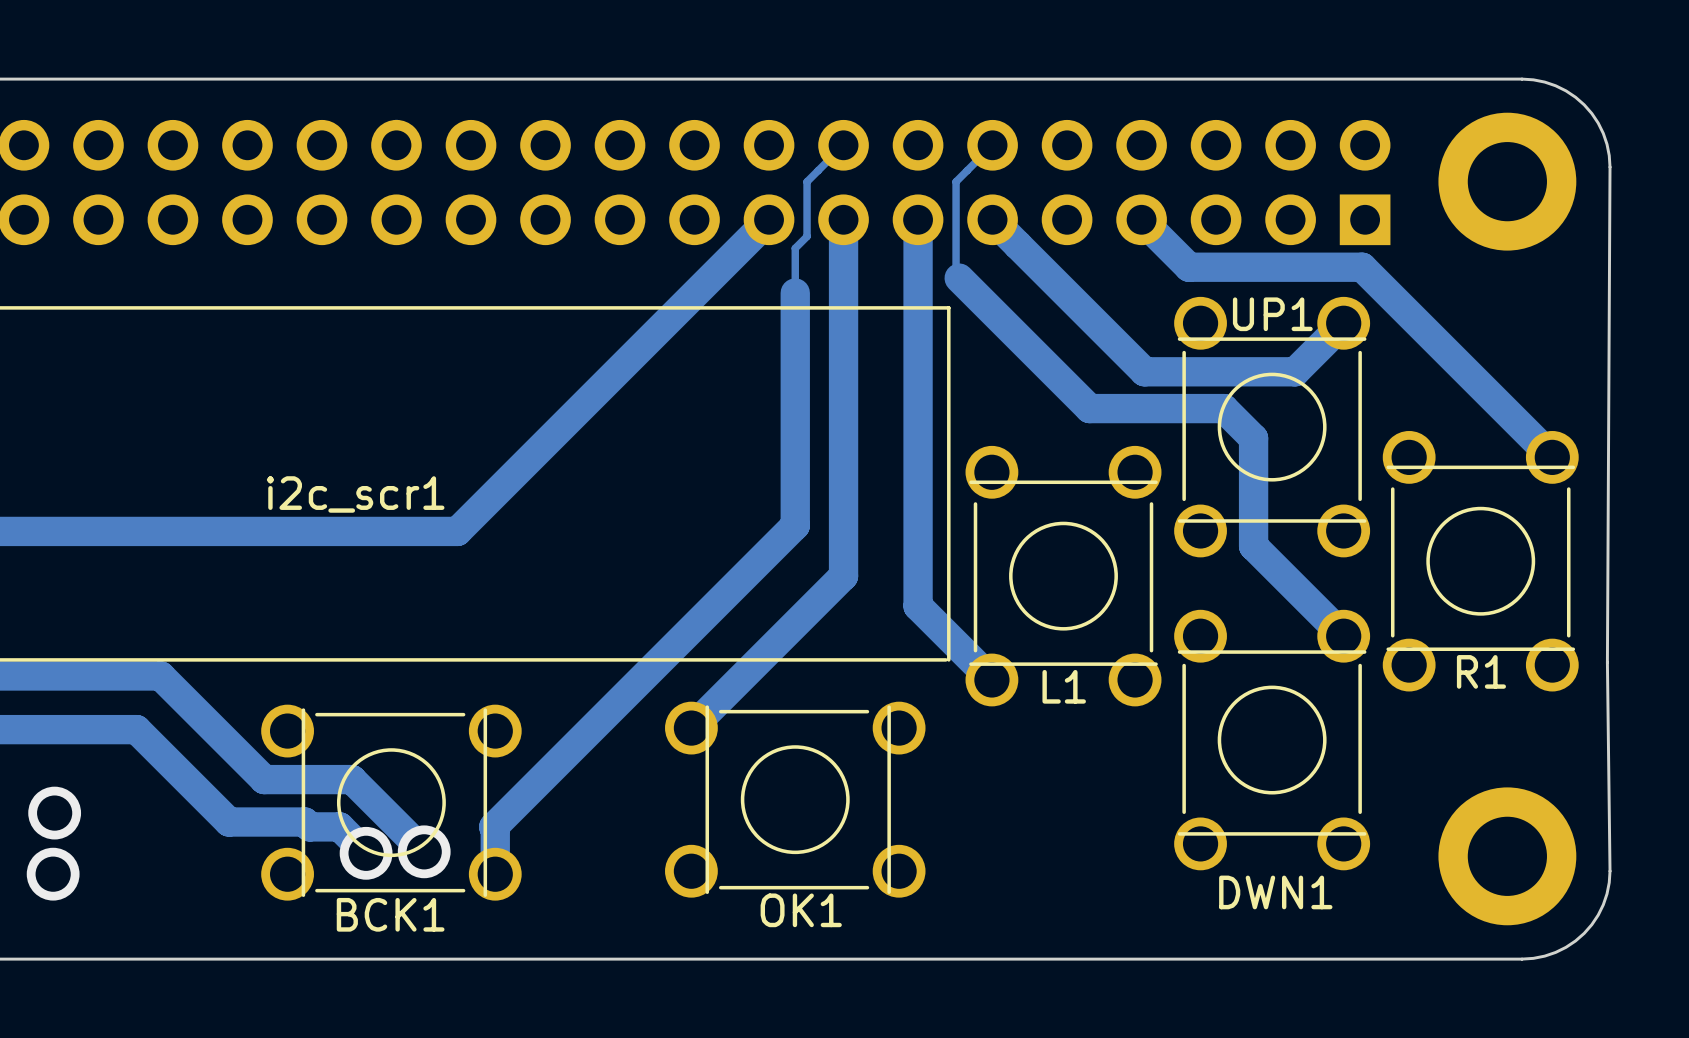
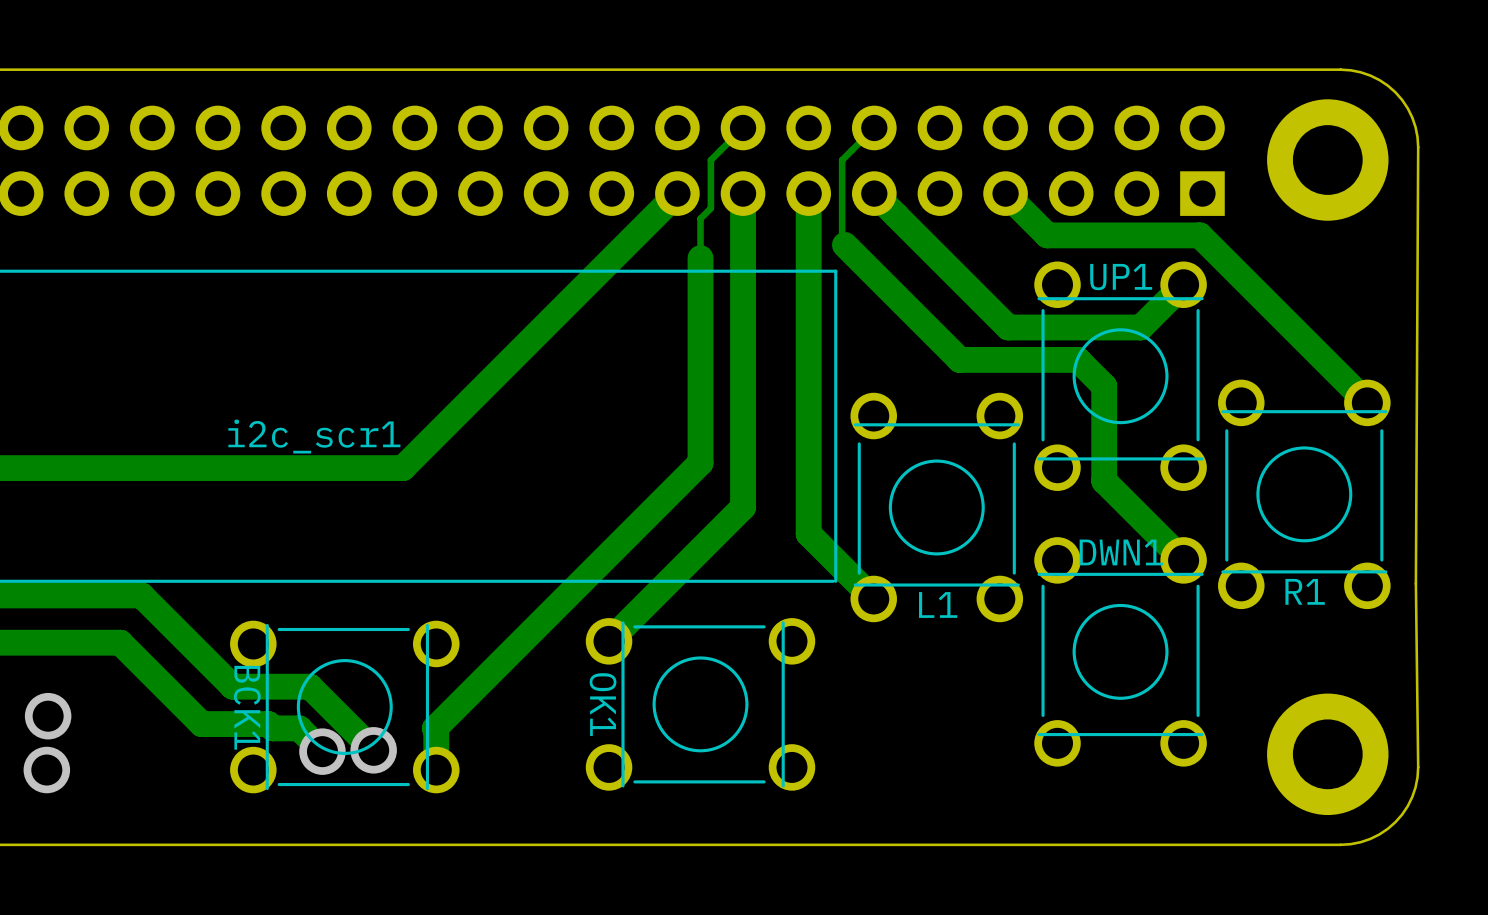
DWN1 name position: DWN1 (1275, 892) -> DWN1 (1121, 552)
OK1 name rotation: 0° (801, 910) -> 90° clockwise (603, 704)
OK1 name position: OK1 (801, 910) -> OK1 (603, 704)
BCK1 name rotation: 0° (390, 914) -> 90° clockwise (247, 707)
BCK1 name position: BCK1 (390, 914) -> BCK1 (247, 707)

